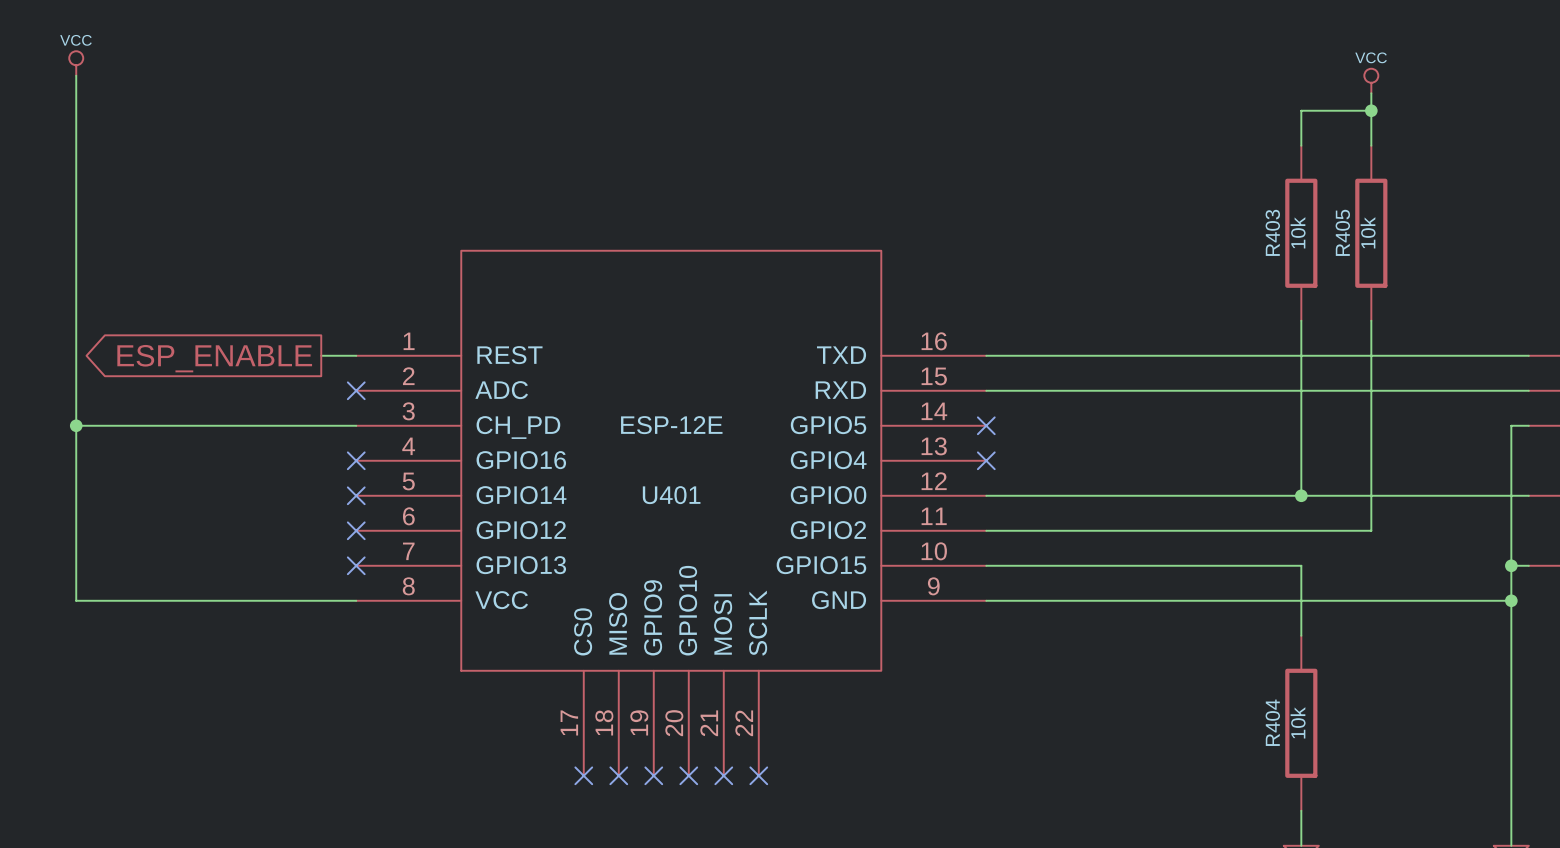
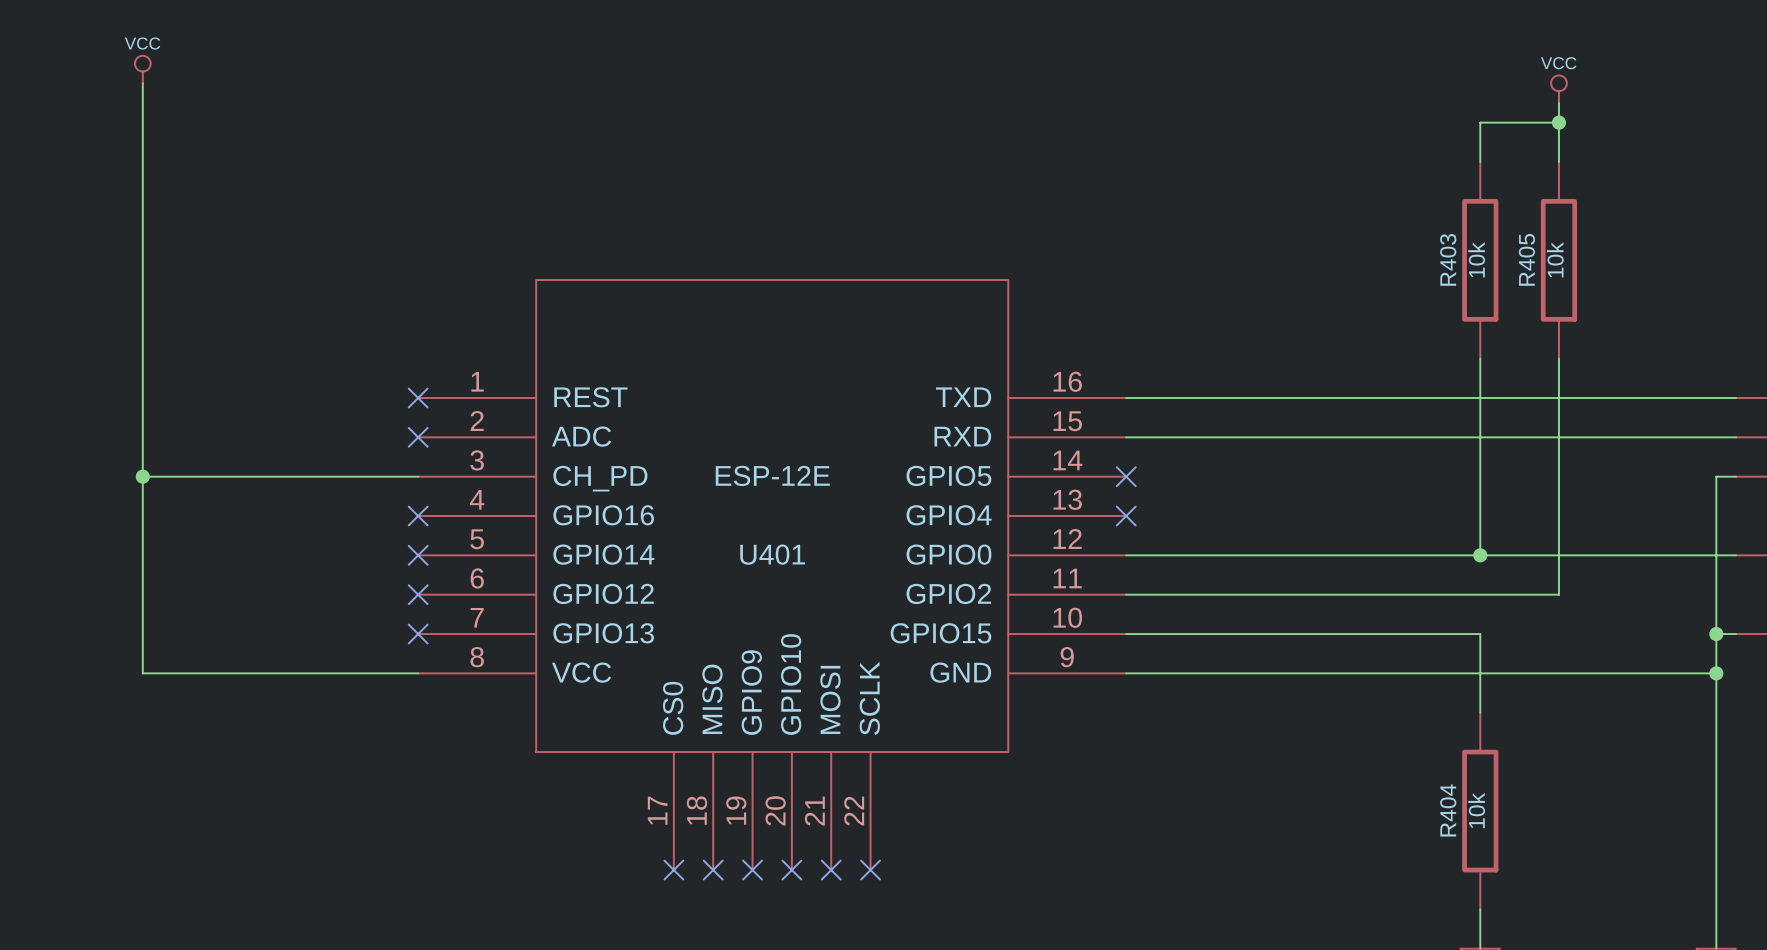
power symbol position: VCC (76, 63) -> VCC (142, 69)
wire: (76, 75) (76, 600) (111, 600) -> (142, 83) (142, 673)
wire: (321, 355) (356, 355) -> none
no-connect mark: none -> (418, 398)
global label: ESP_ENABLE (214, 358) -> none
wire: (76, 425) (111, 425) -> none
junction position: (76, 425) -> (142, 476)

